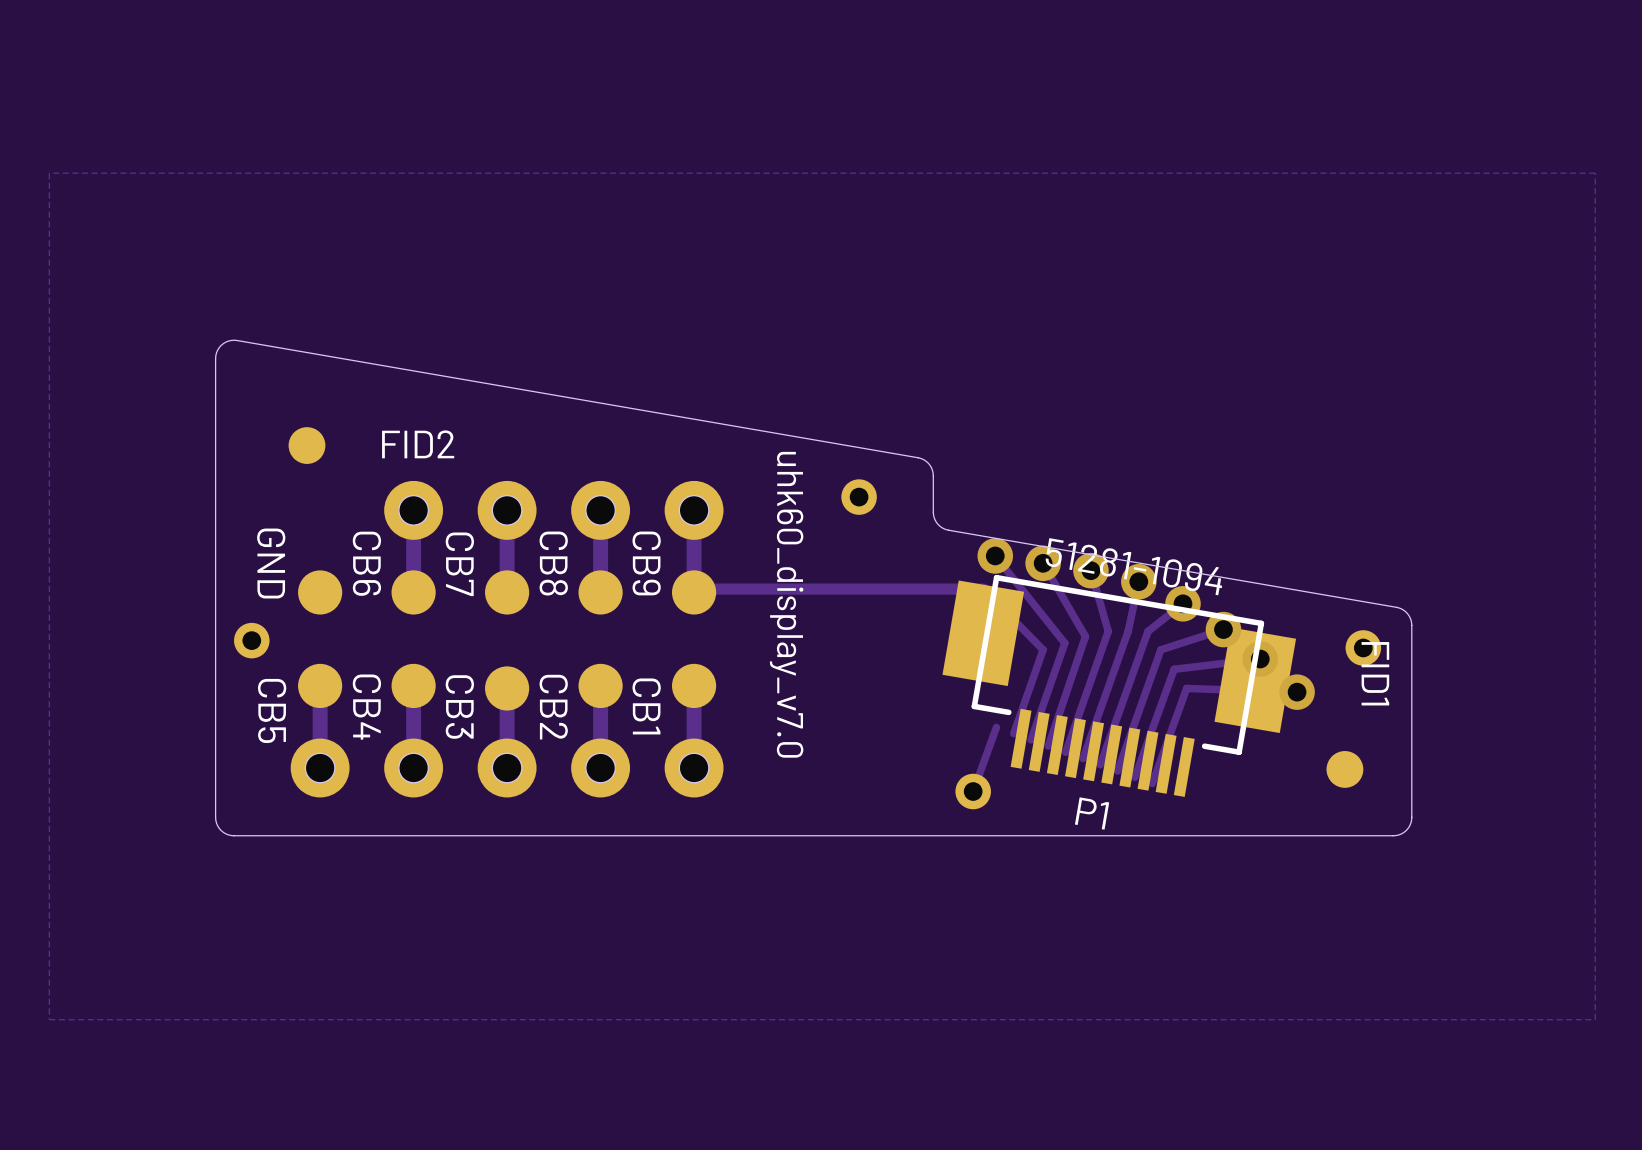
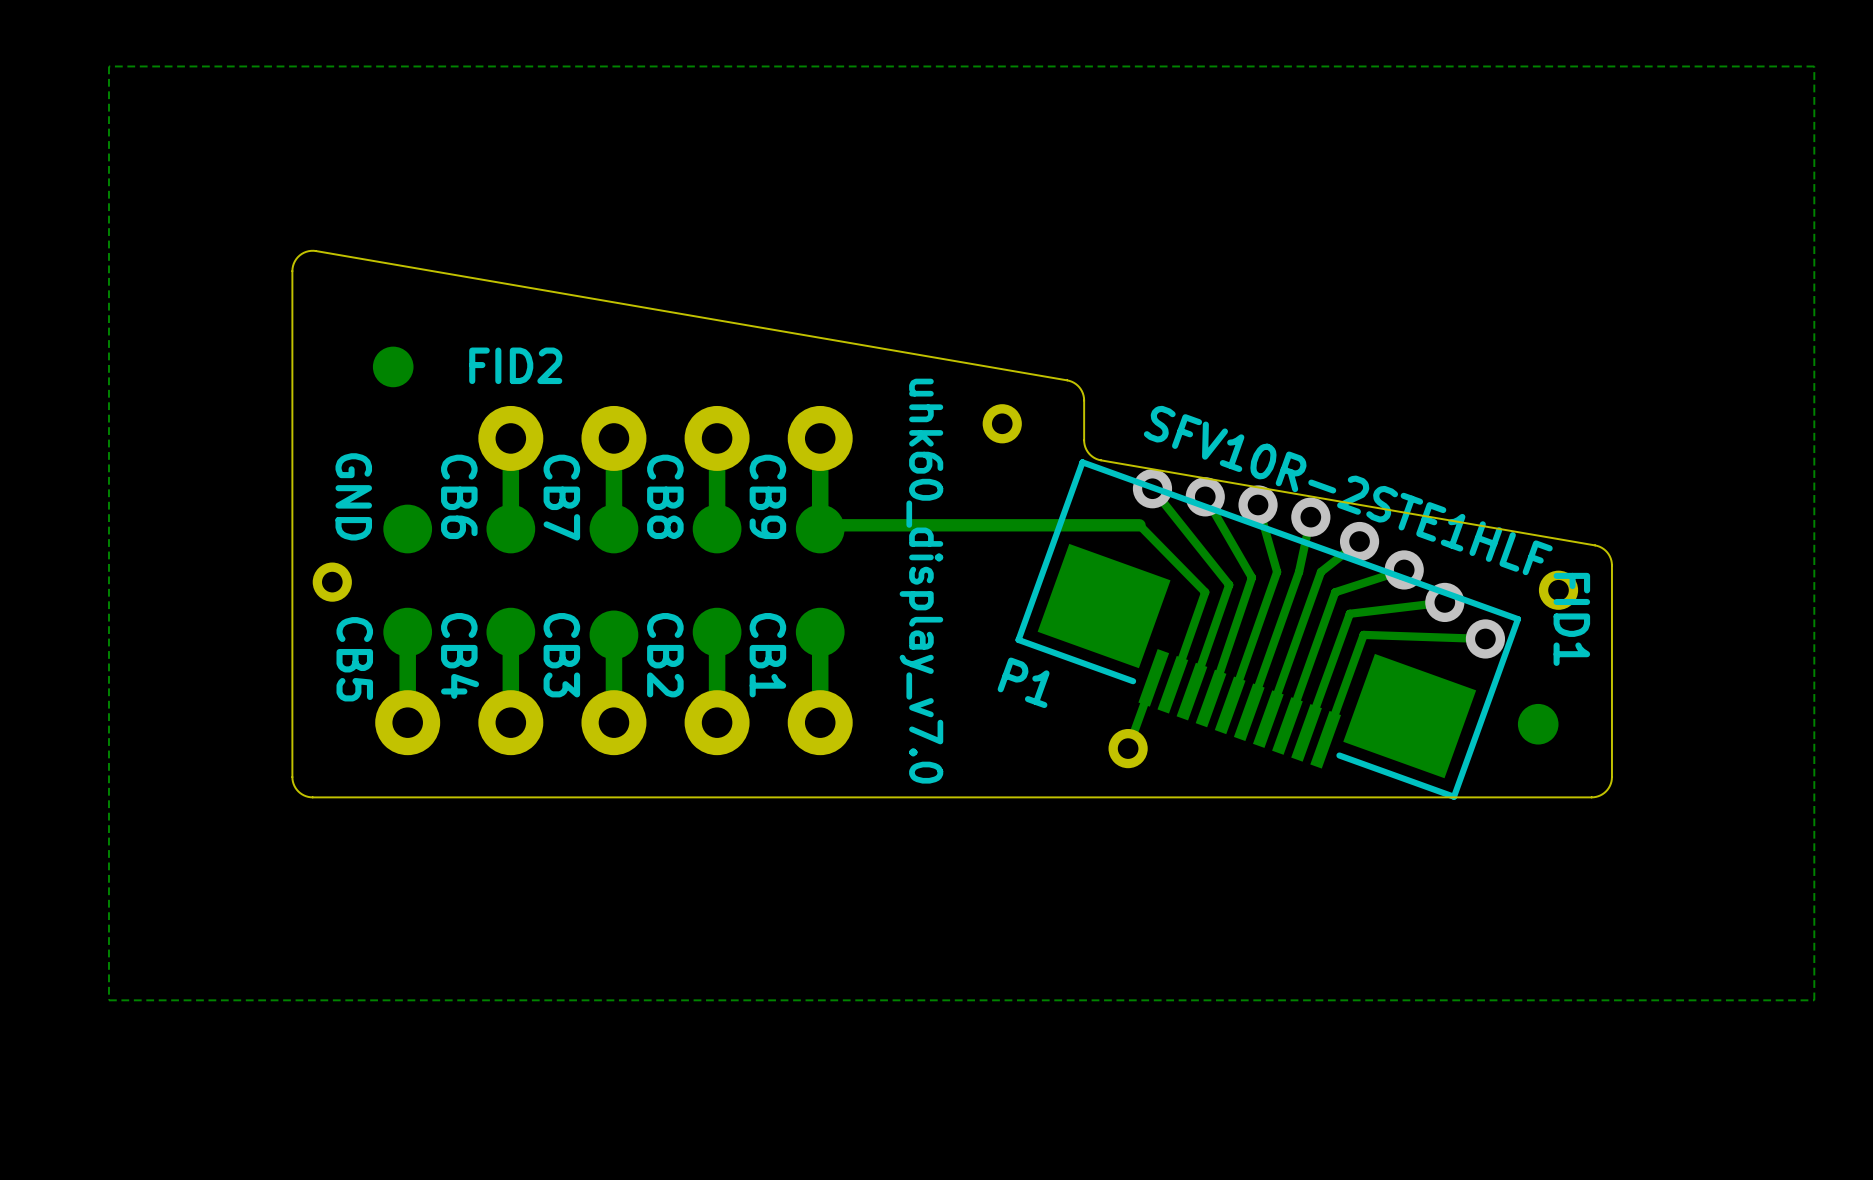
P1 value: 51281-1094 (1133, 566) -> SFV10R-2STE1HLF (1348, 490)
P1 footprint: [942, 574, 1297, 797] -> [1015, 459, 1522, 800]
P1 name position: P1 (1092, 813) -> P1 (1023, 682)

